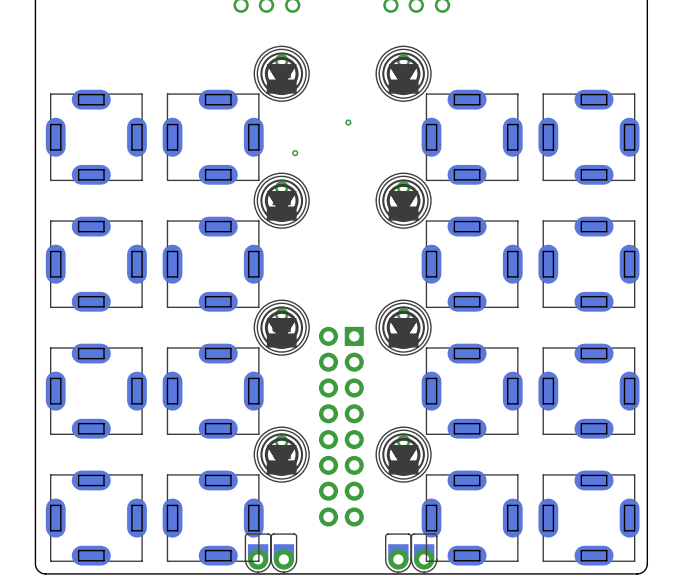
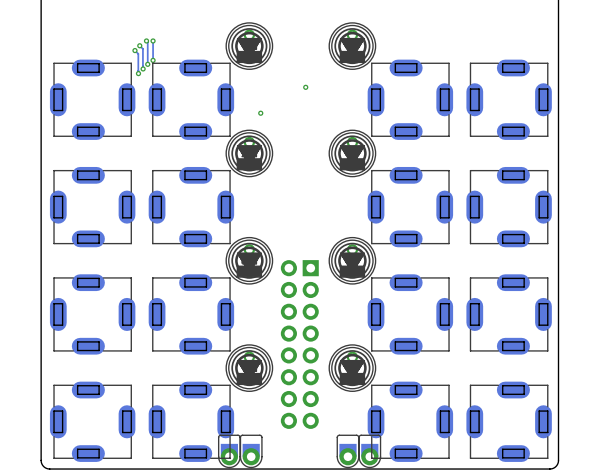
track: none -> (146, 40) (147, 64)
via: none -> (146, 40)
track: none -> (153, 40) (153, 60)
via: none -> (153, 40)
track: none -> (139, 45) (142, 48) (143, 68)
via: none -> (139, 45)
track: none -> (134, 50) (138, 53) (138, 73)
via: none -> (134, 50)
via: none -> (153, 60)
via: none -> (147, 64)
via: none -> (143, 68)
via: none -> (138, 73)

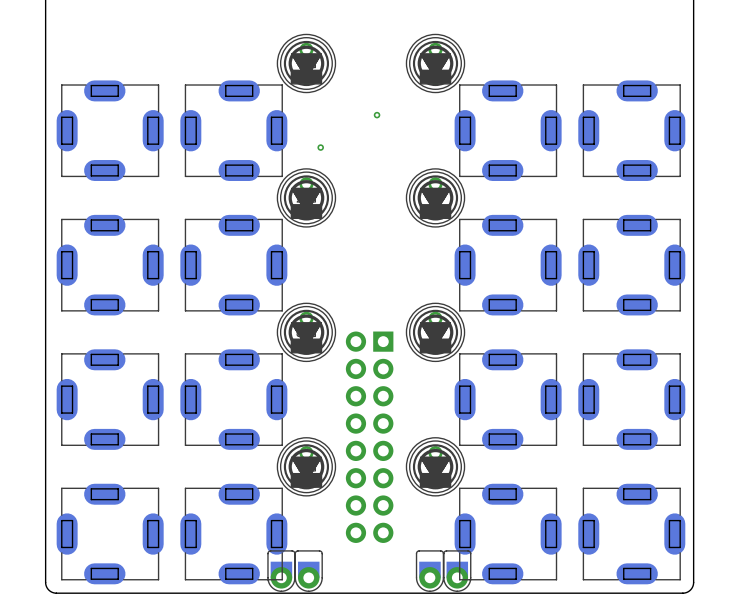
track: (146, 40) (147, 64) -> none
via: (146, 40) -> none
track: (153, 40) (153, 60) -> none
via: (153, 40) -> none
track: (139, 45) (142, 48) (143, 68) -> none
via: (139, 45) -> none
track: (134, 50) (138, 53) (138, 73) -> none
via: (134, 50) -> none
via: (153, 60) -> none
via: (147, 64) -> none
via: (143, 68) -> none
via: (138, 73) -> none

